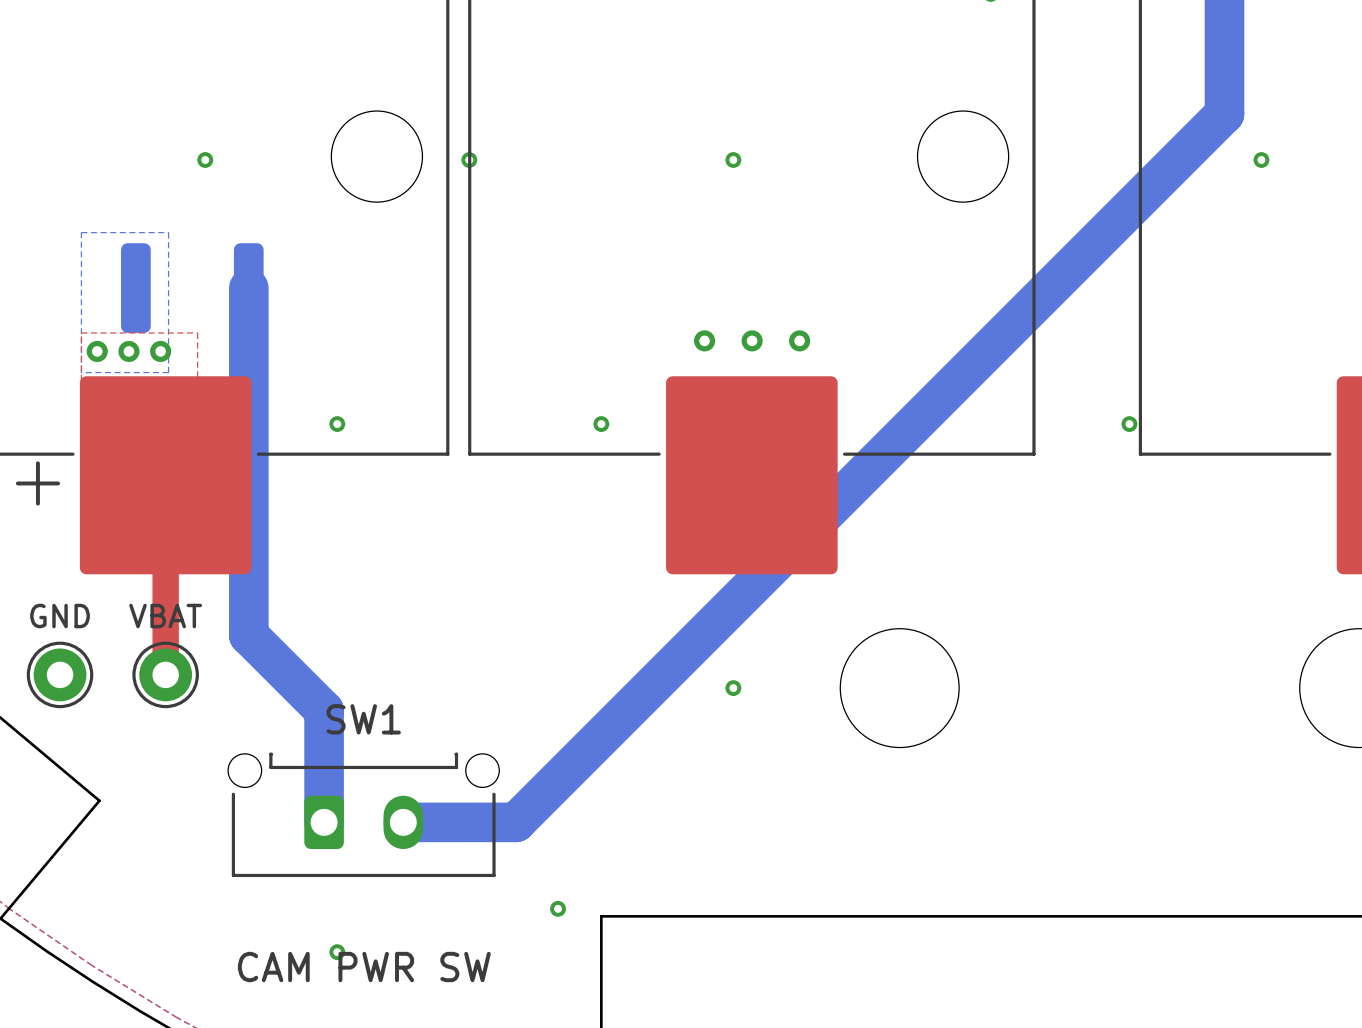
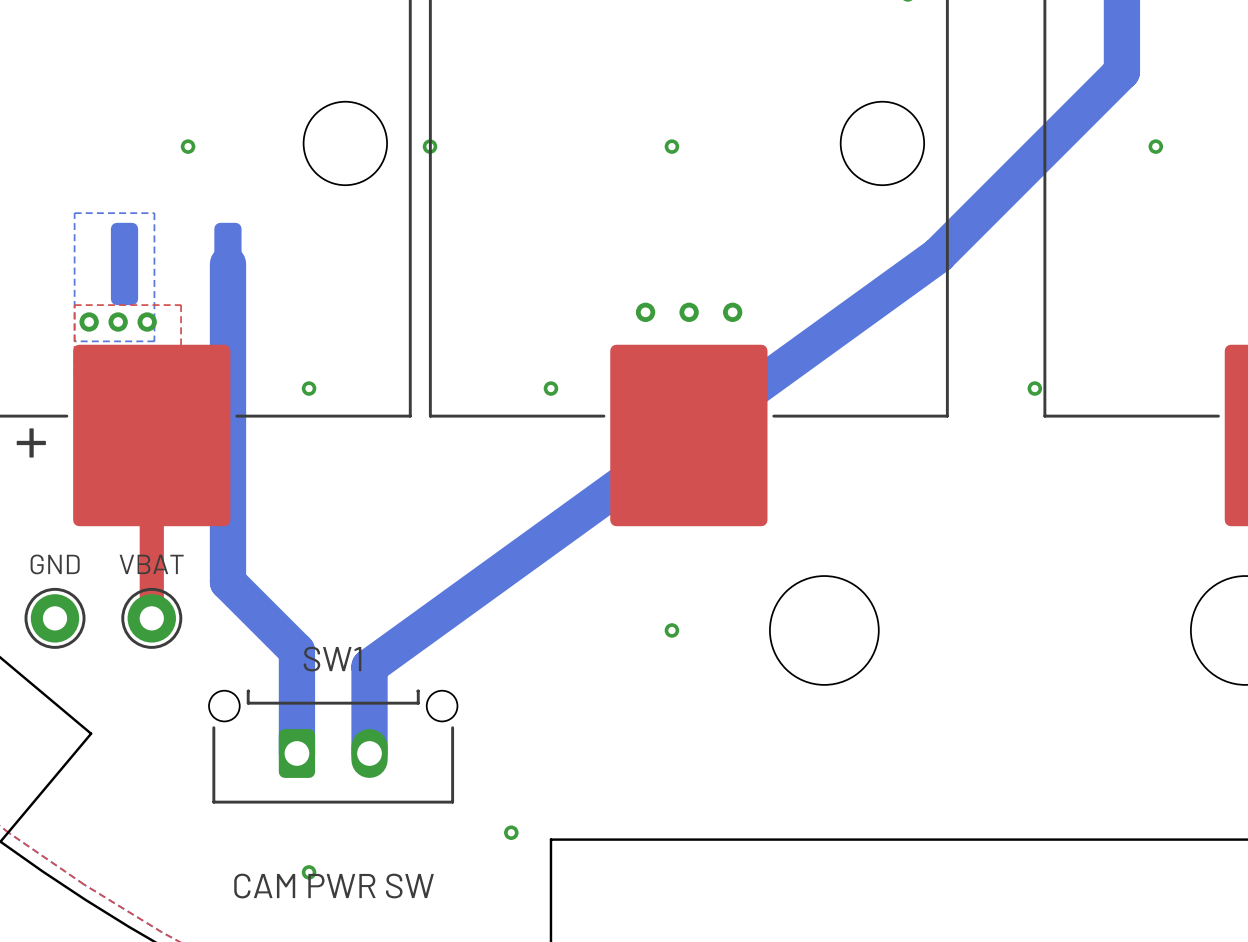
bottom track: (1224, 78) (1224, 113) (515, 822) (403, 822) -> (1121, 71) (938, 255) (369, 666) (369, 753)

